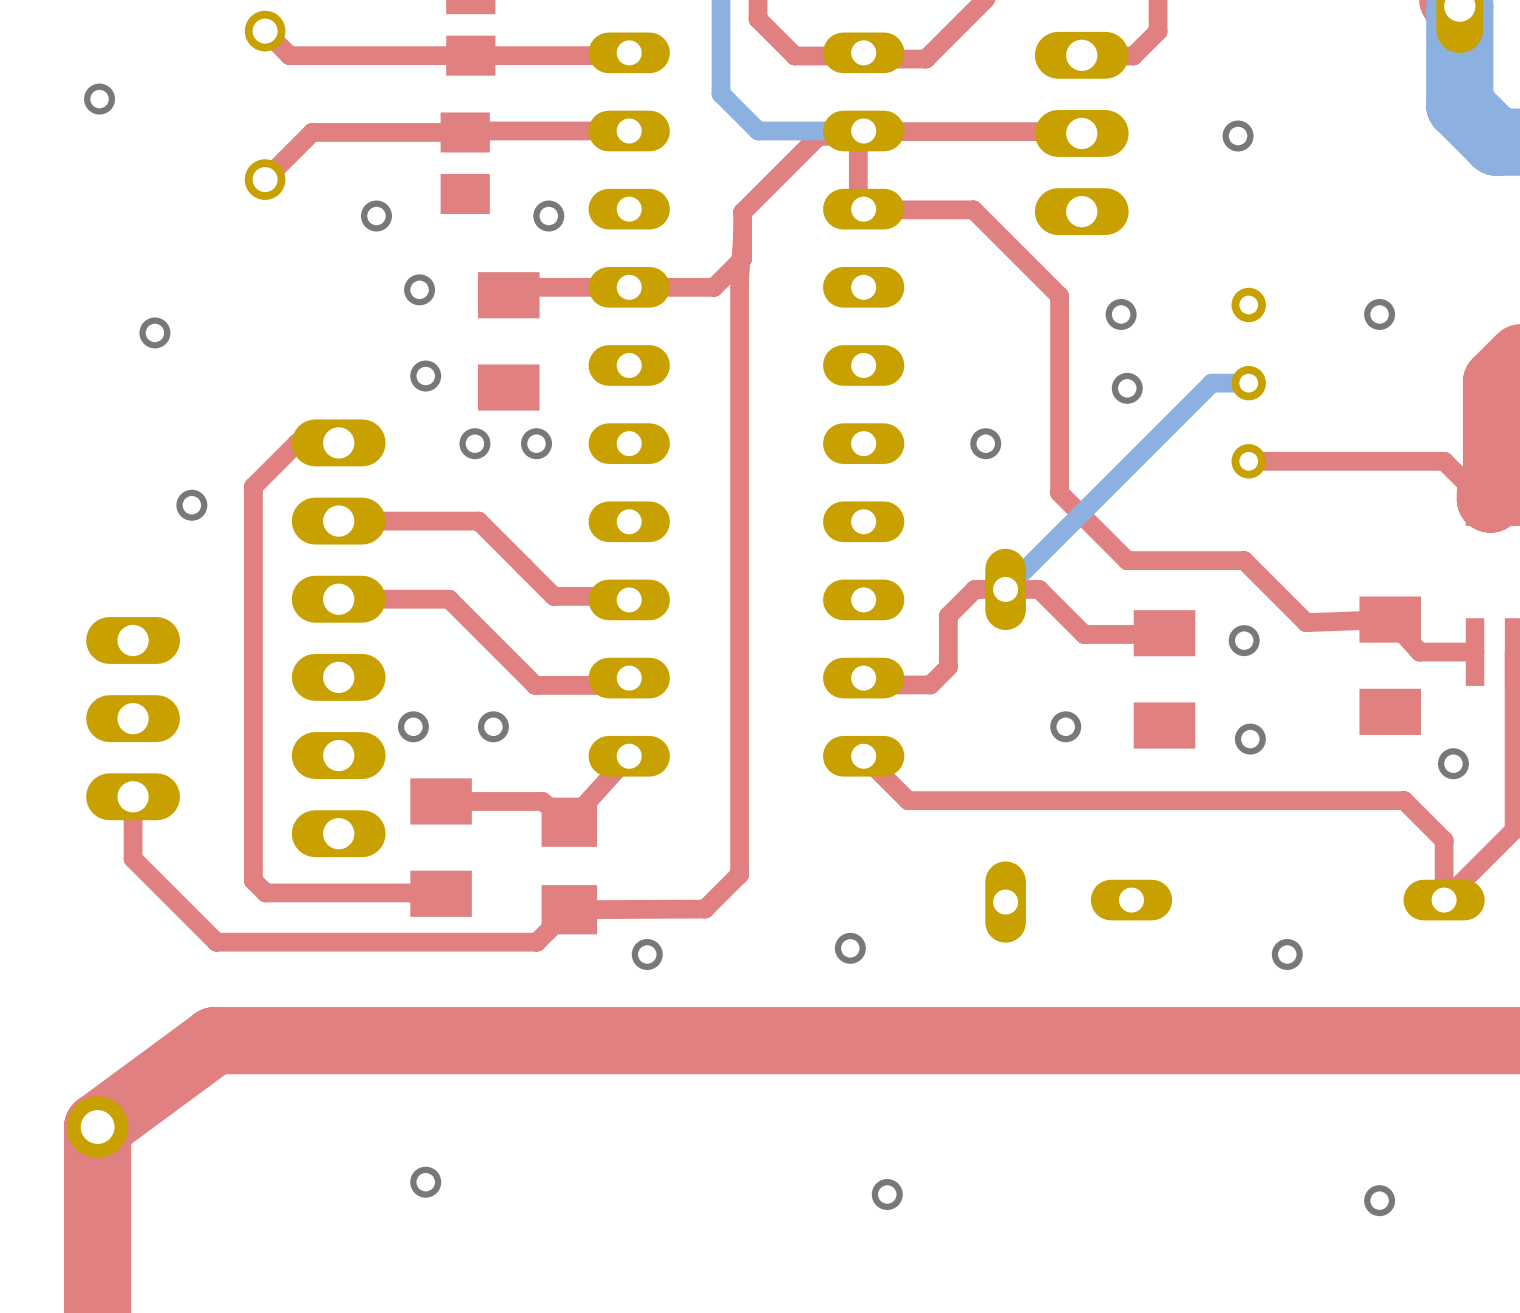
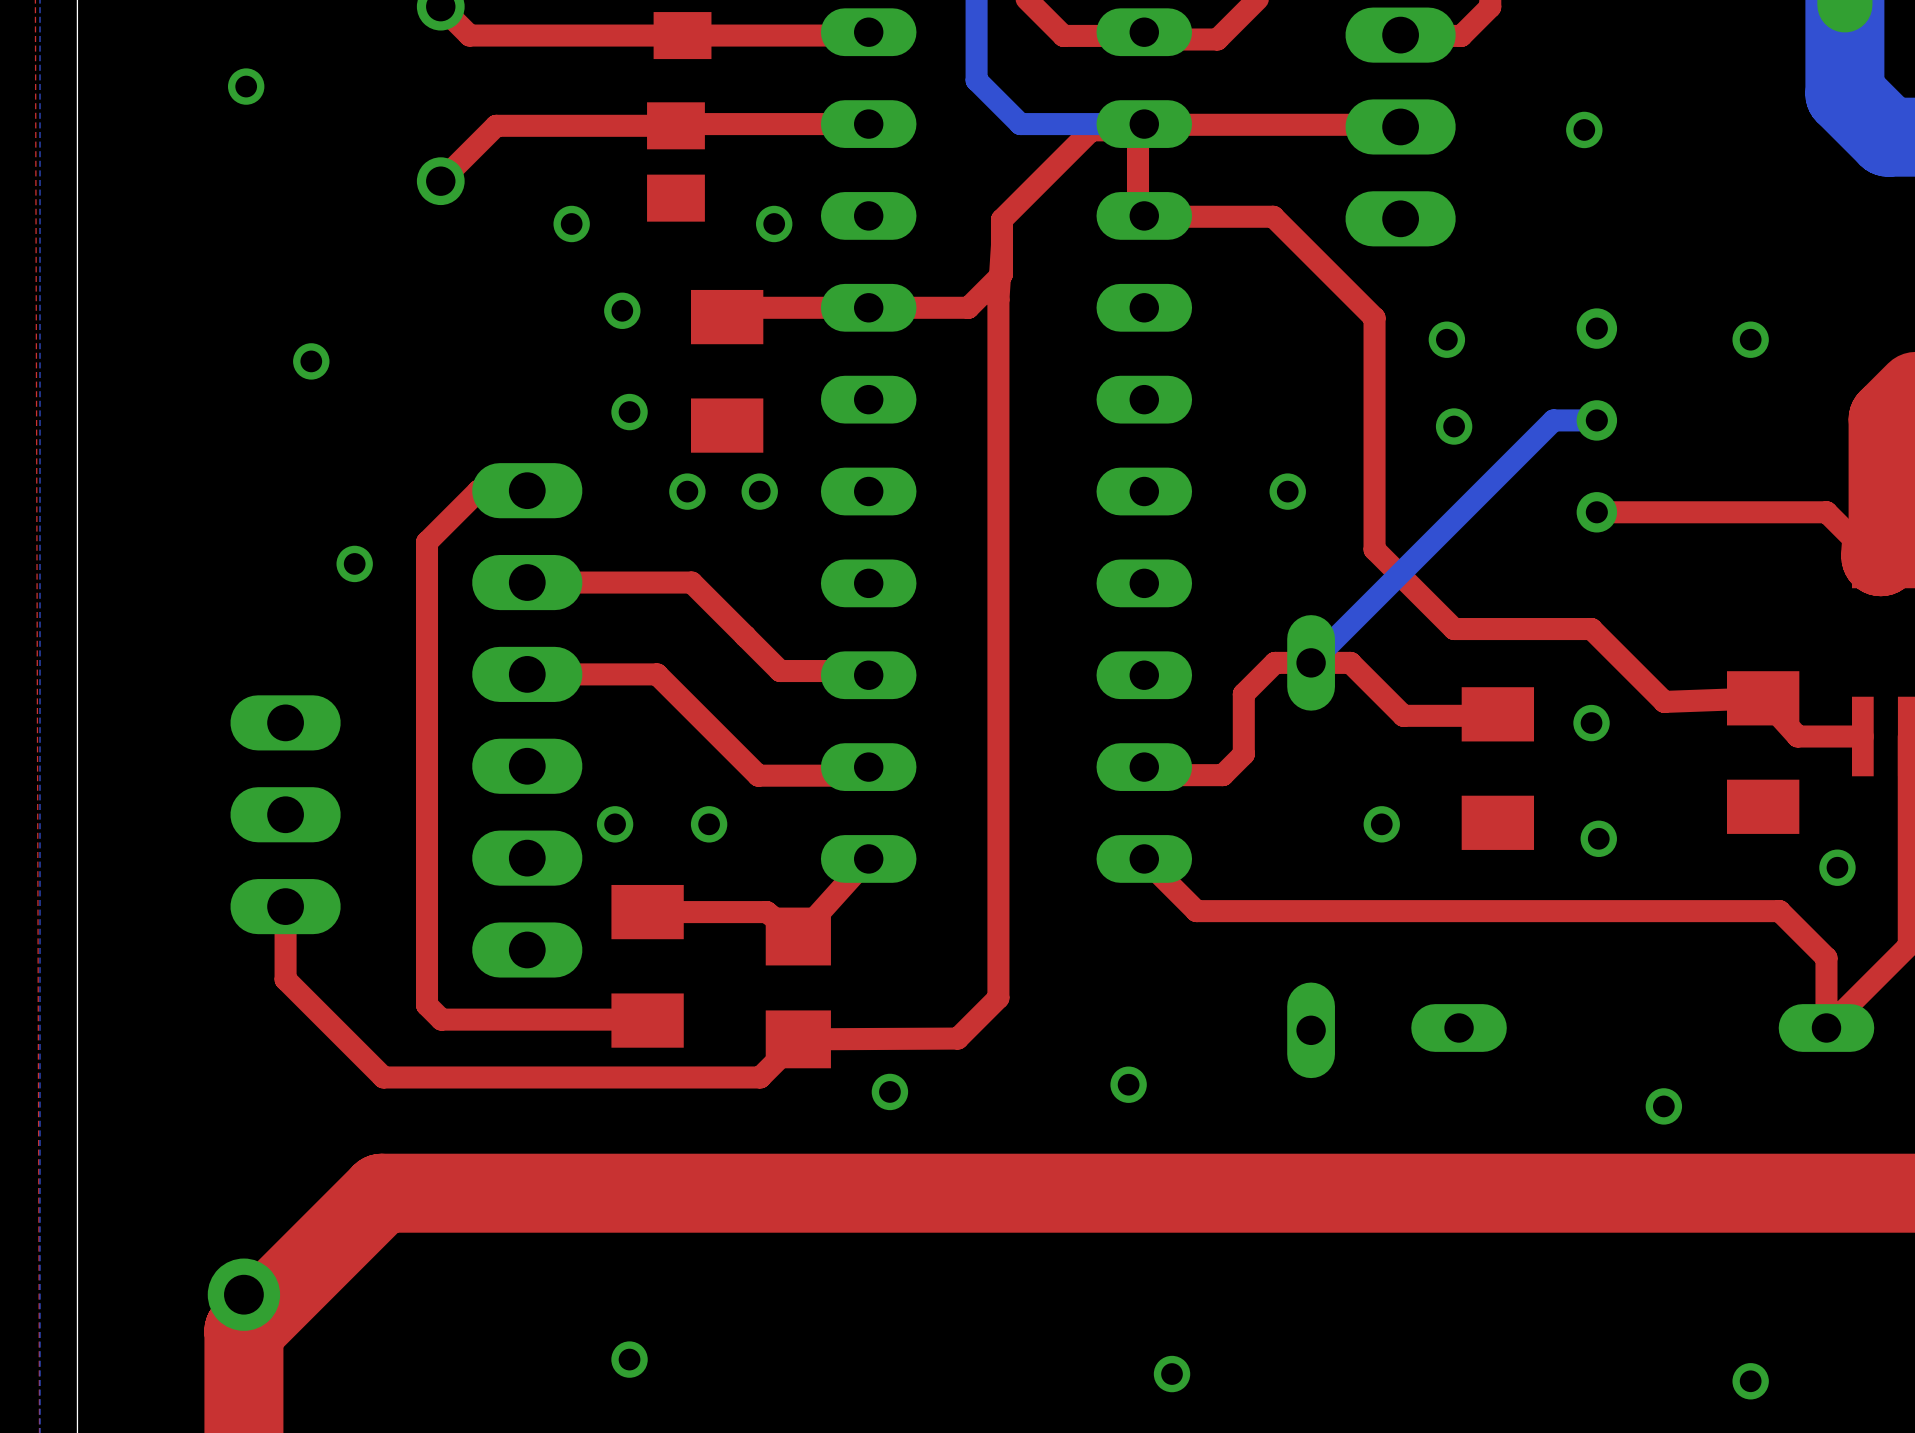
via position: (1287, 954) -> (1663, 1106)
top track: (214, 1040) (97, 1126) (97, 1157) -> (381, 1193) (243, 1330)

